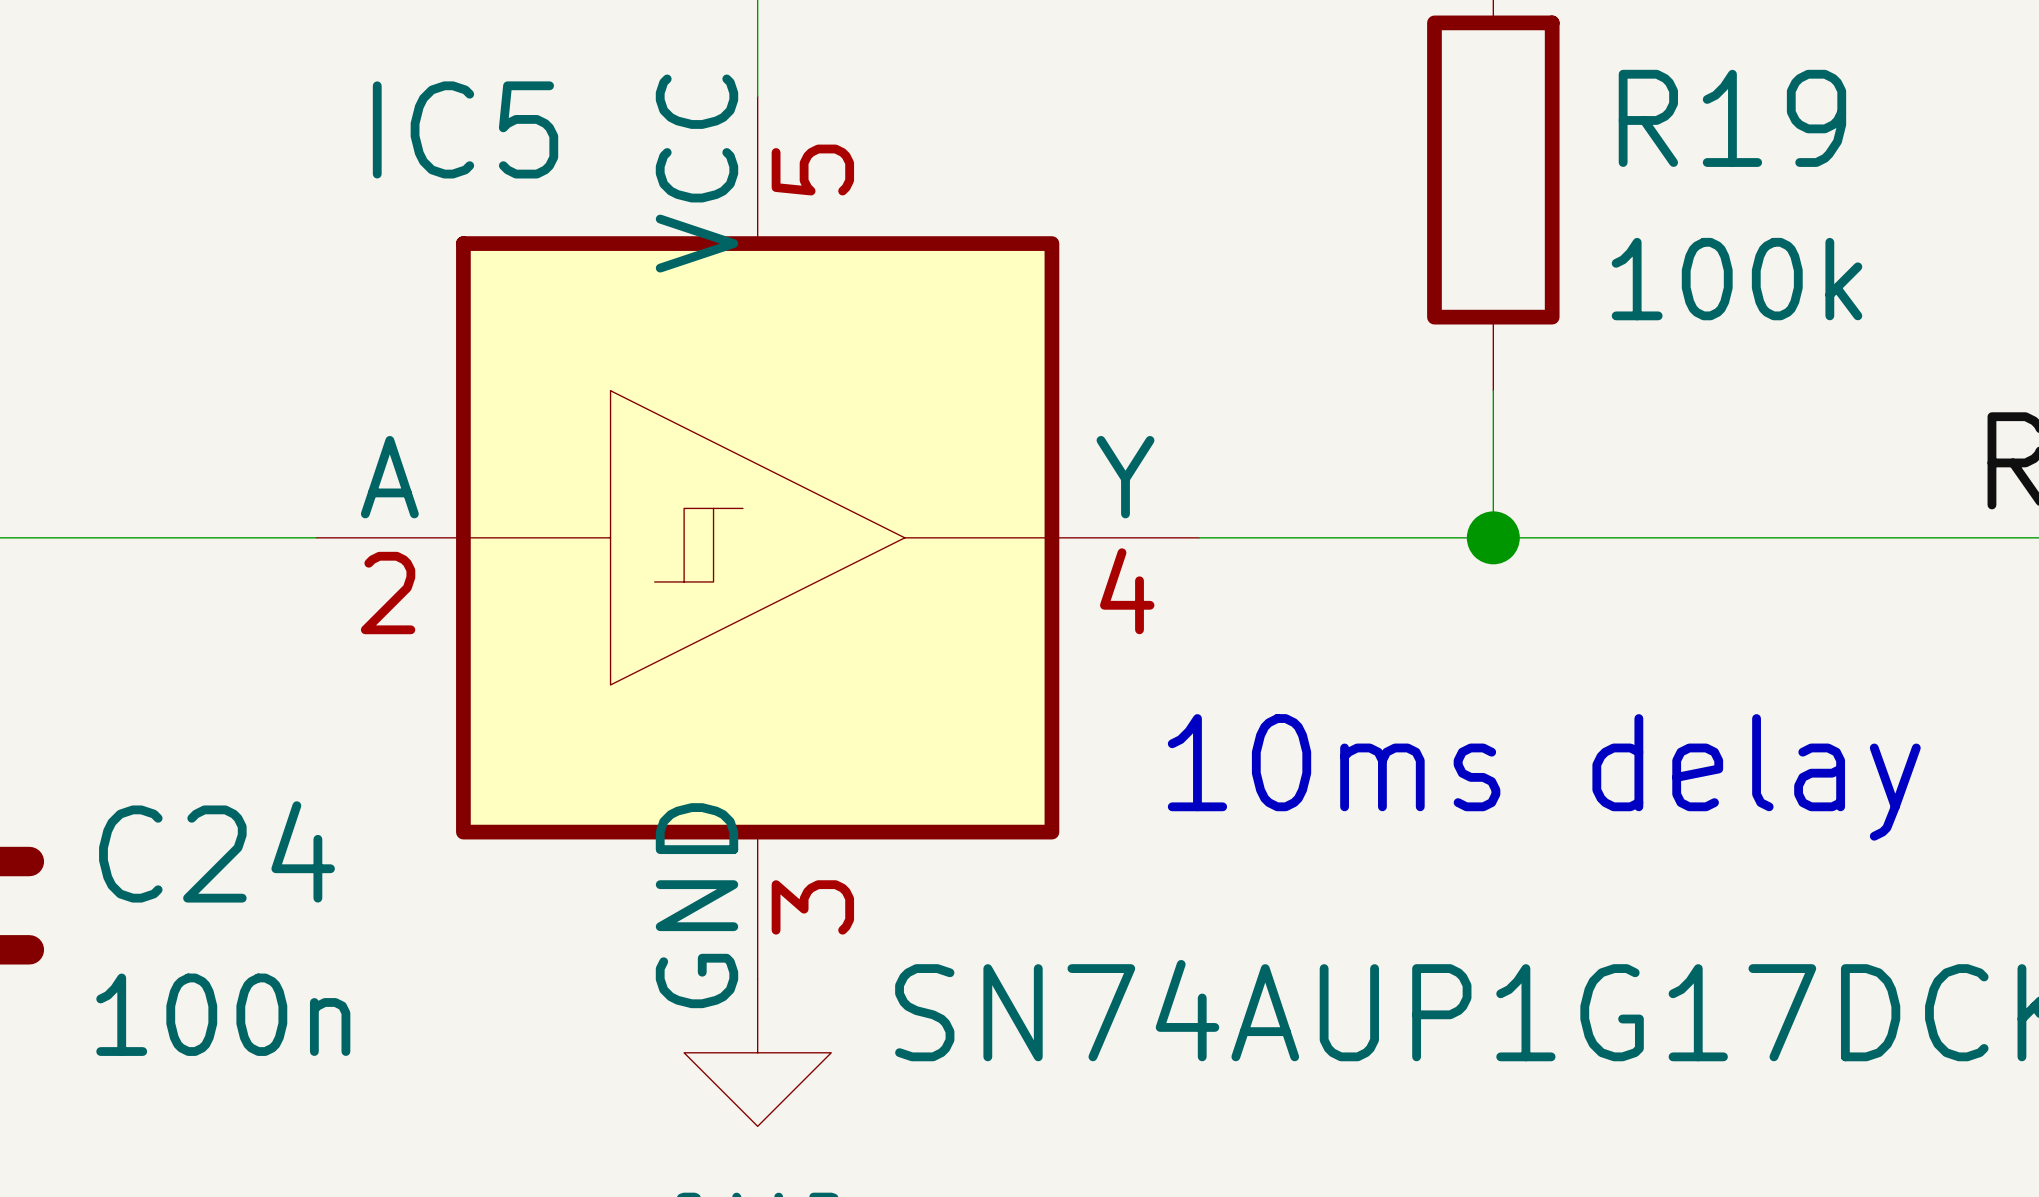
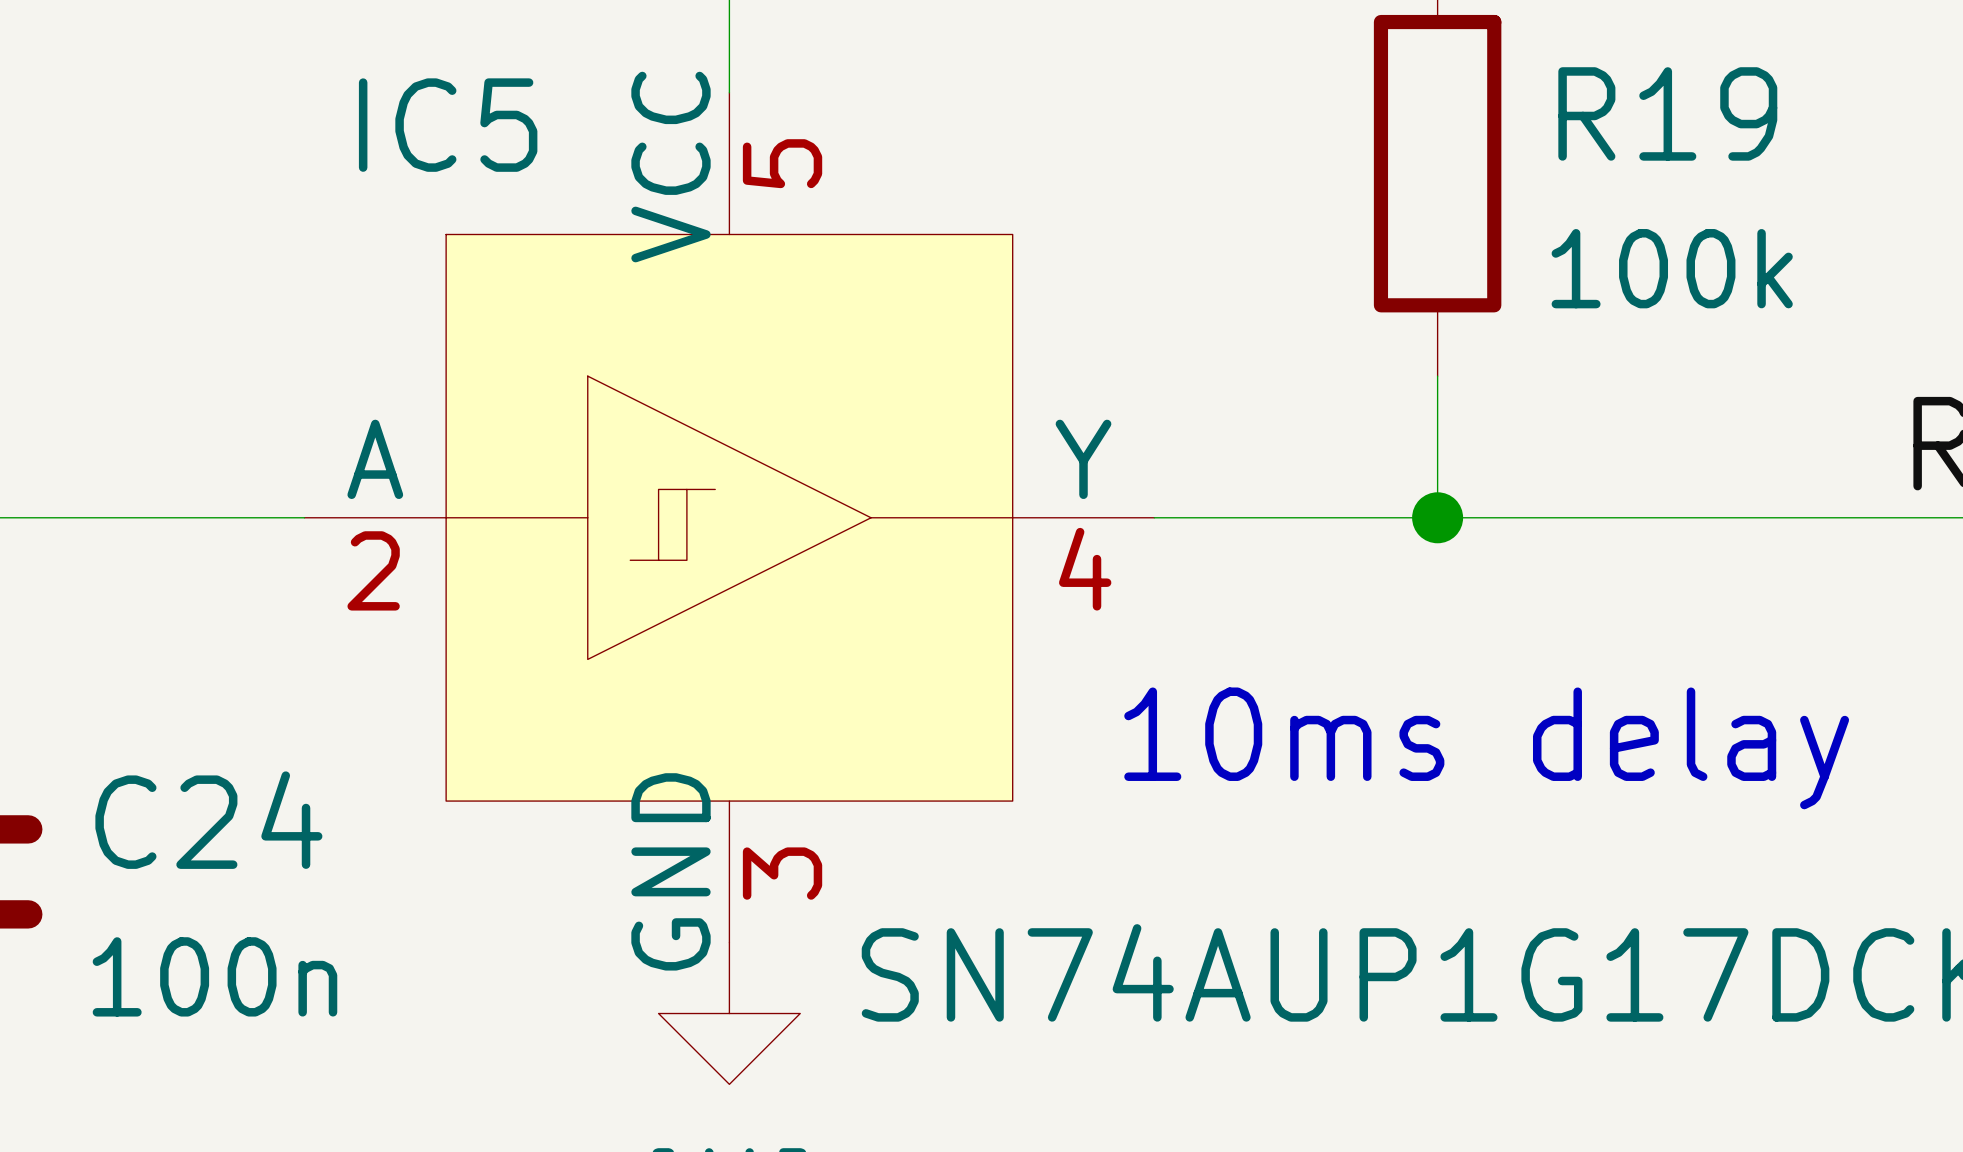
IC5 symbol: [316, 96, 1200, 980] -> [304, 92, 1155, 943]

